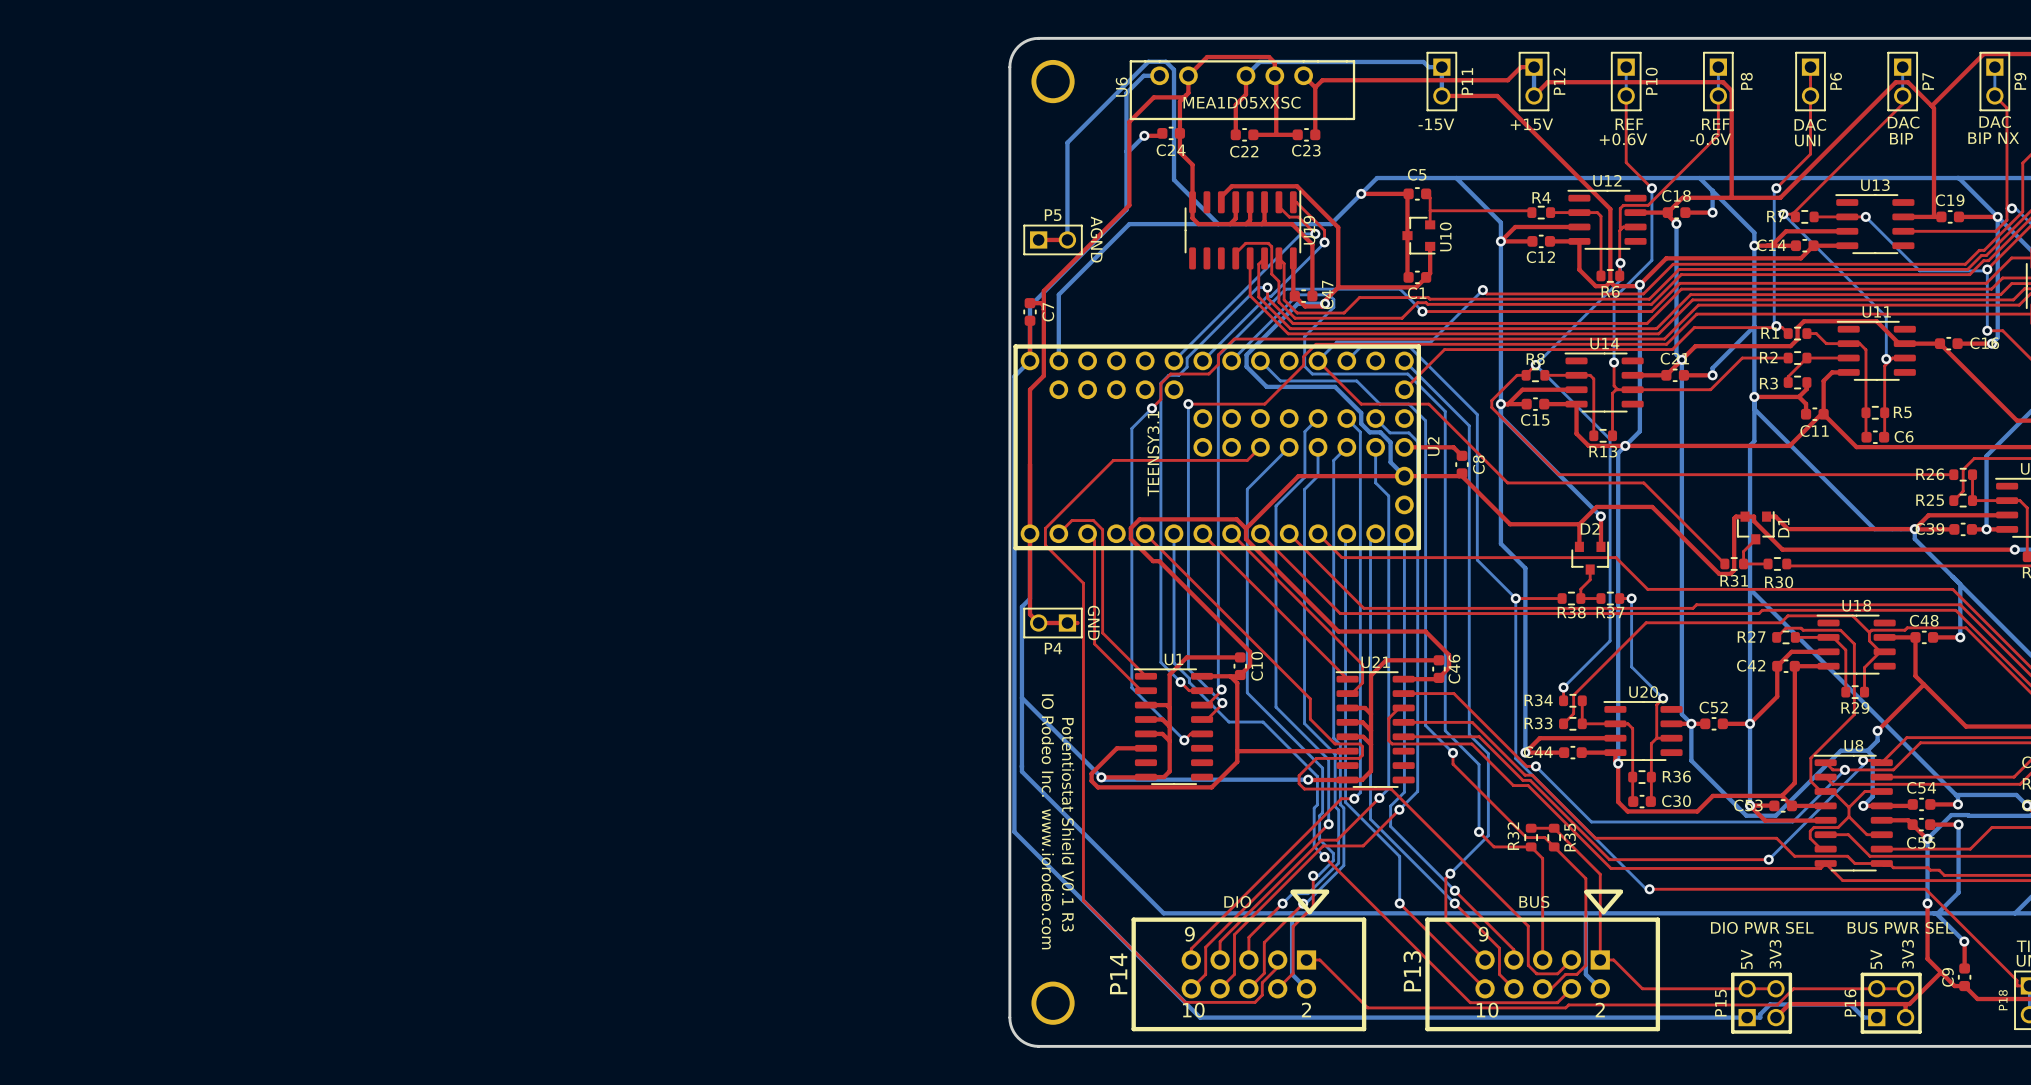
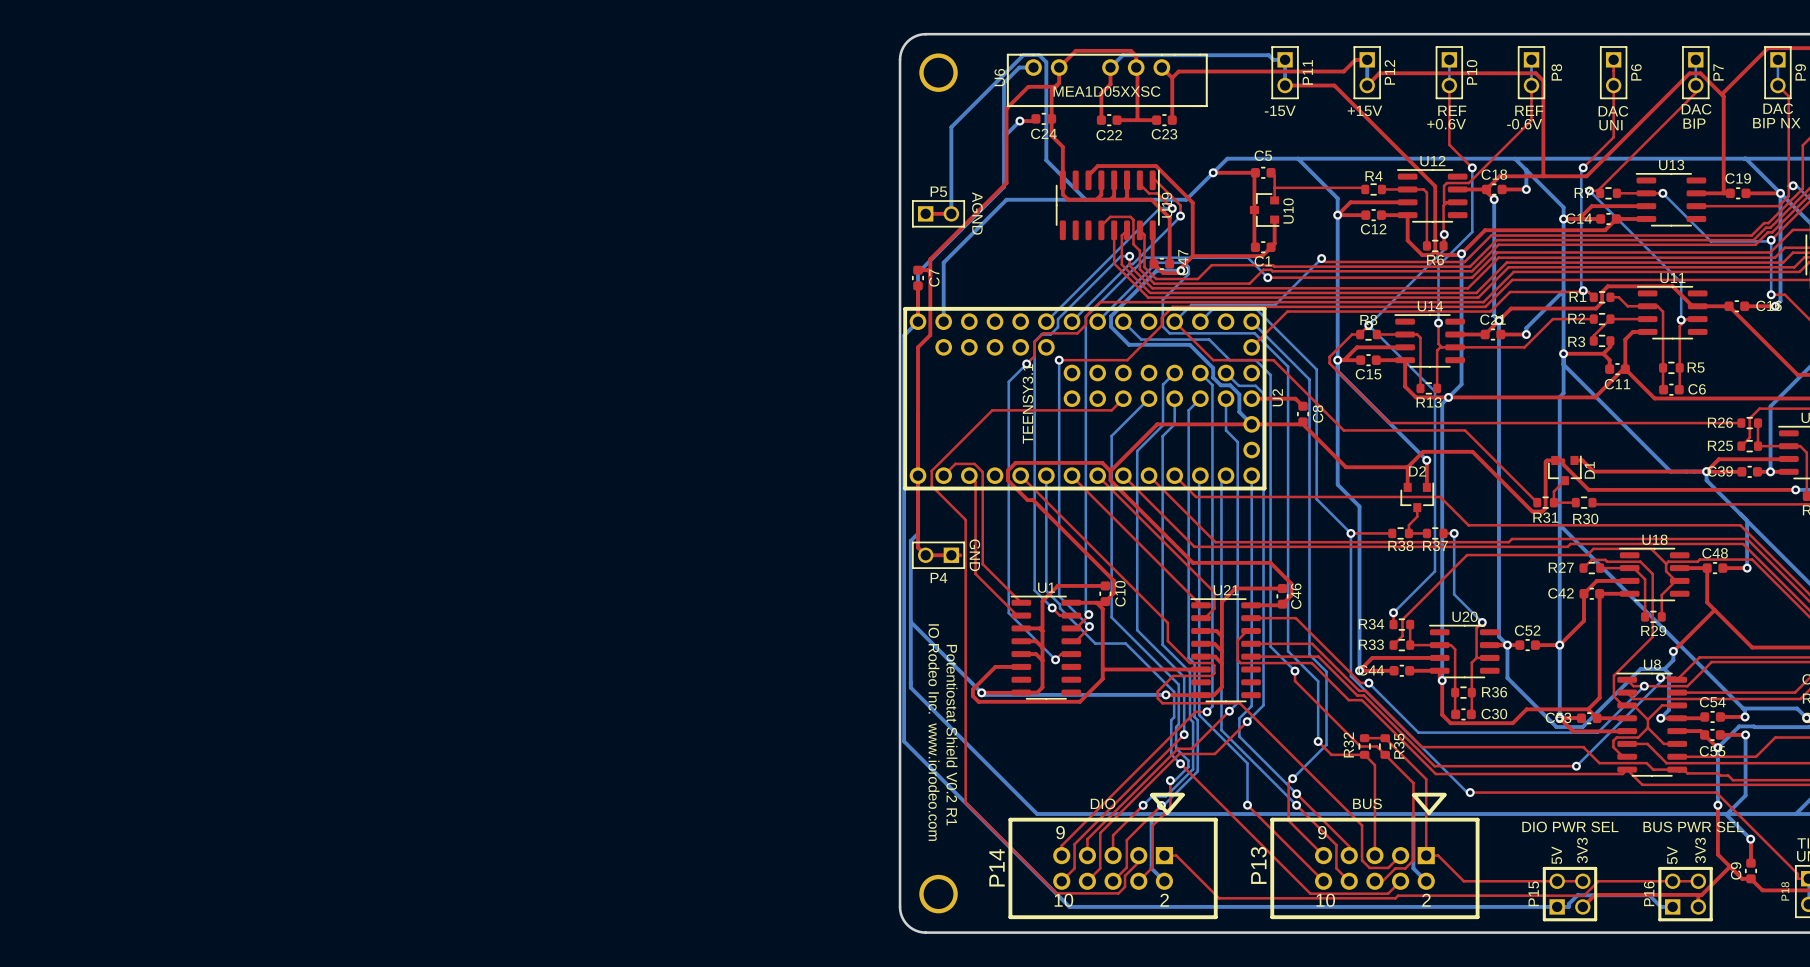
text: Potentiostat Shield V0.1 R3 (1068, 824) -> Potentiostat Shield V0.2 R1 (951, 735)

